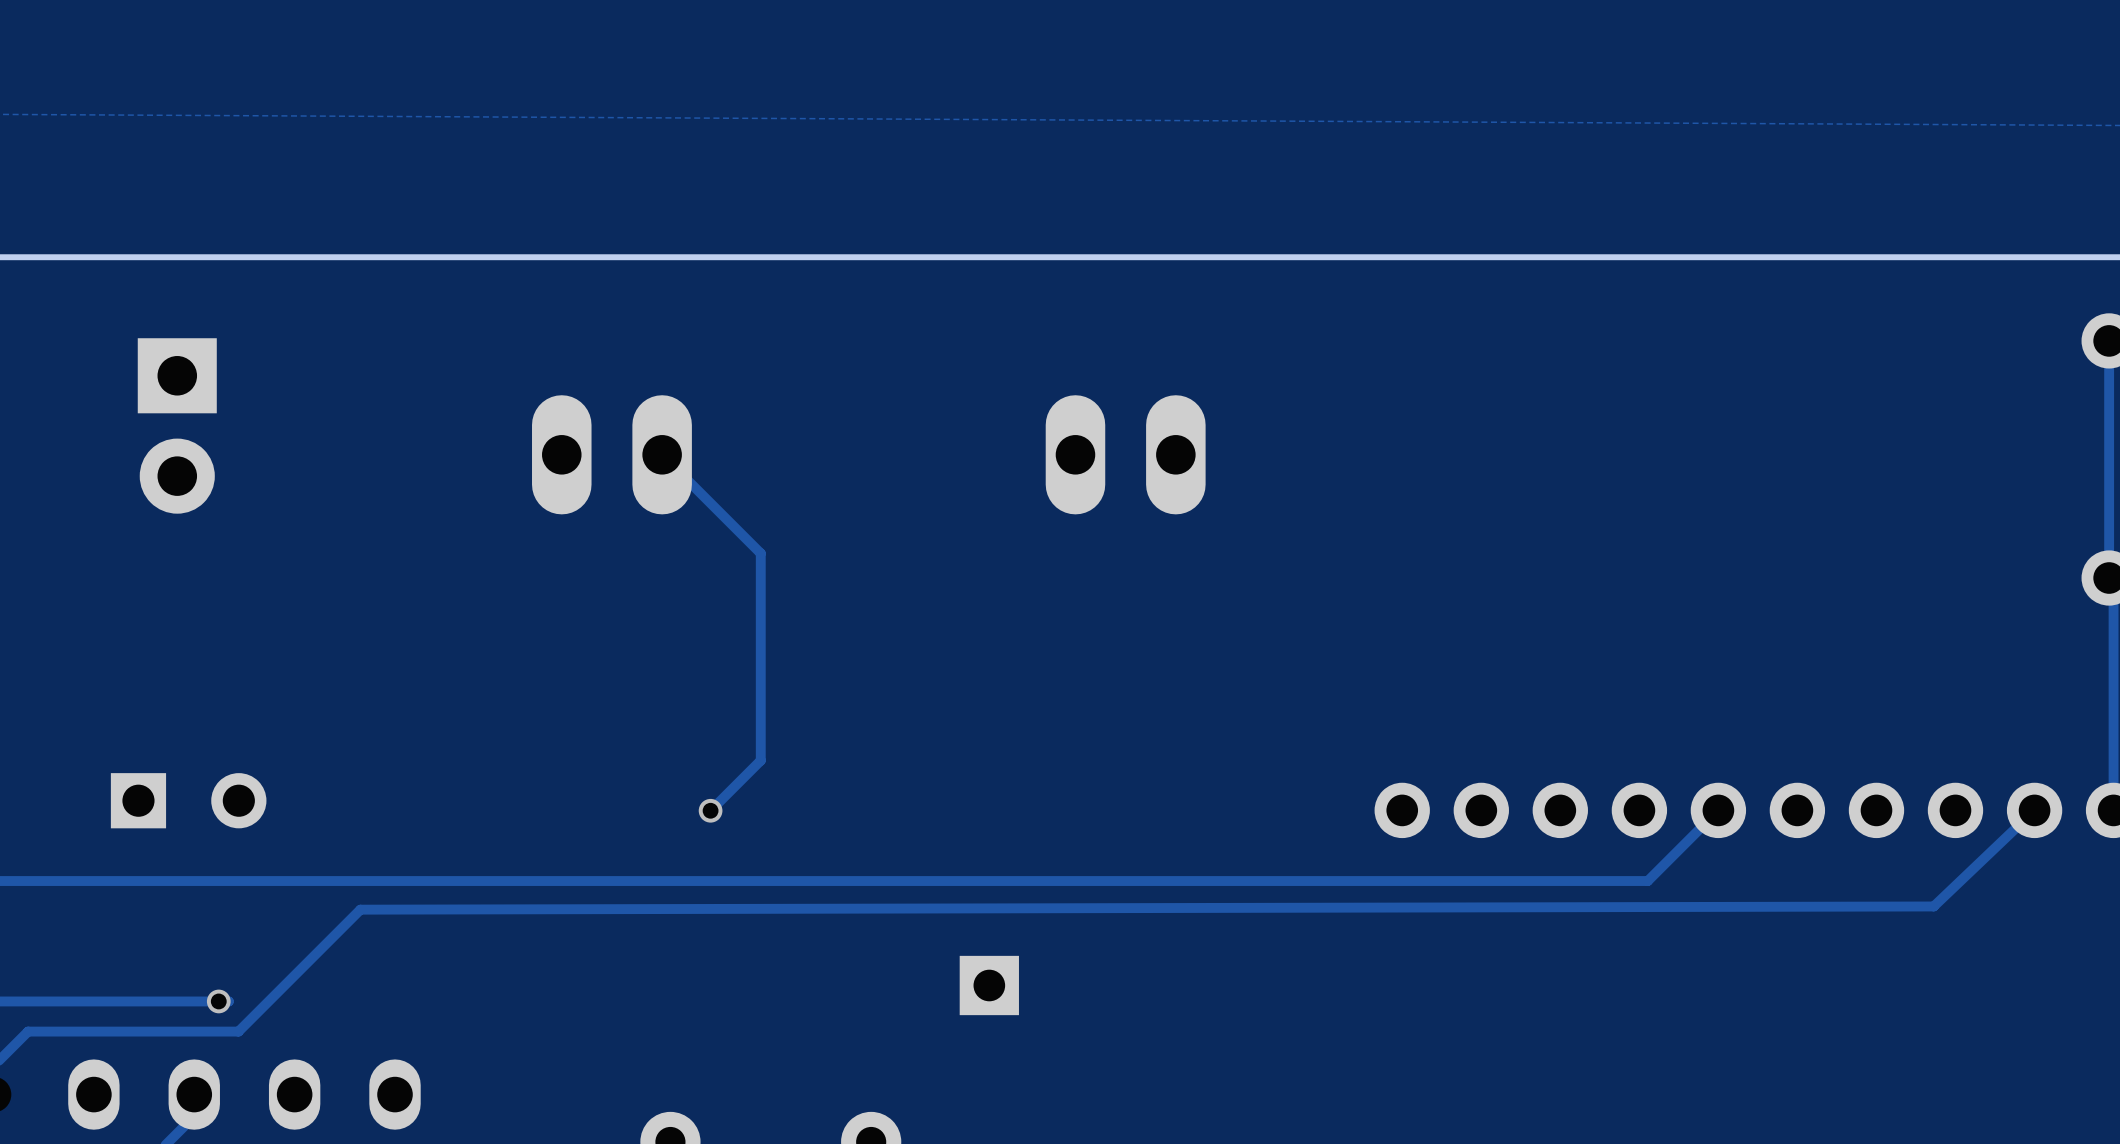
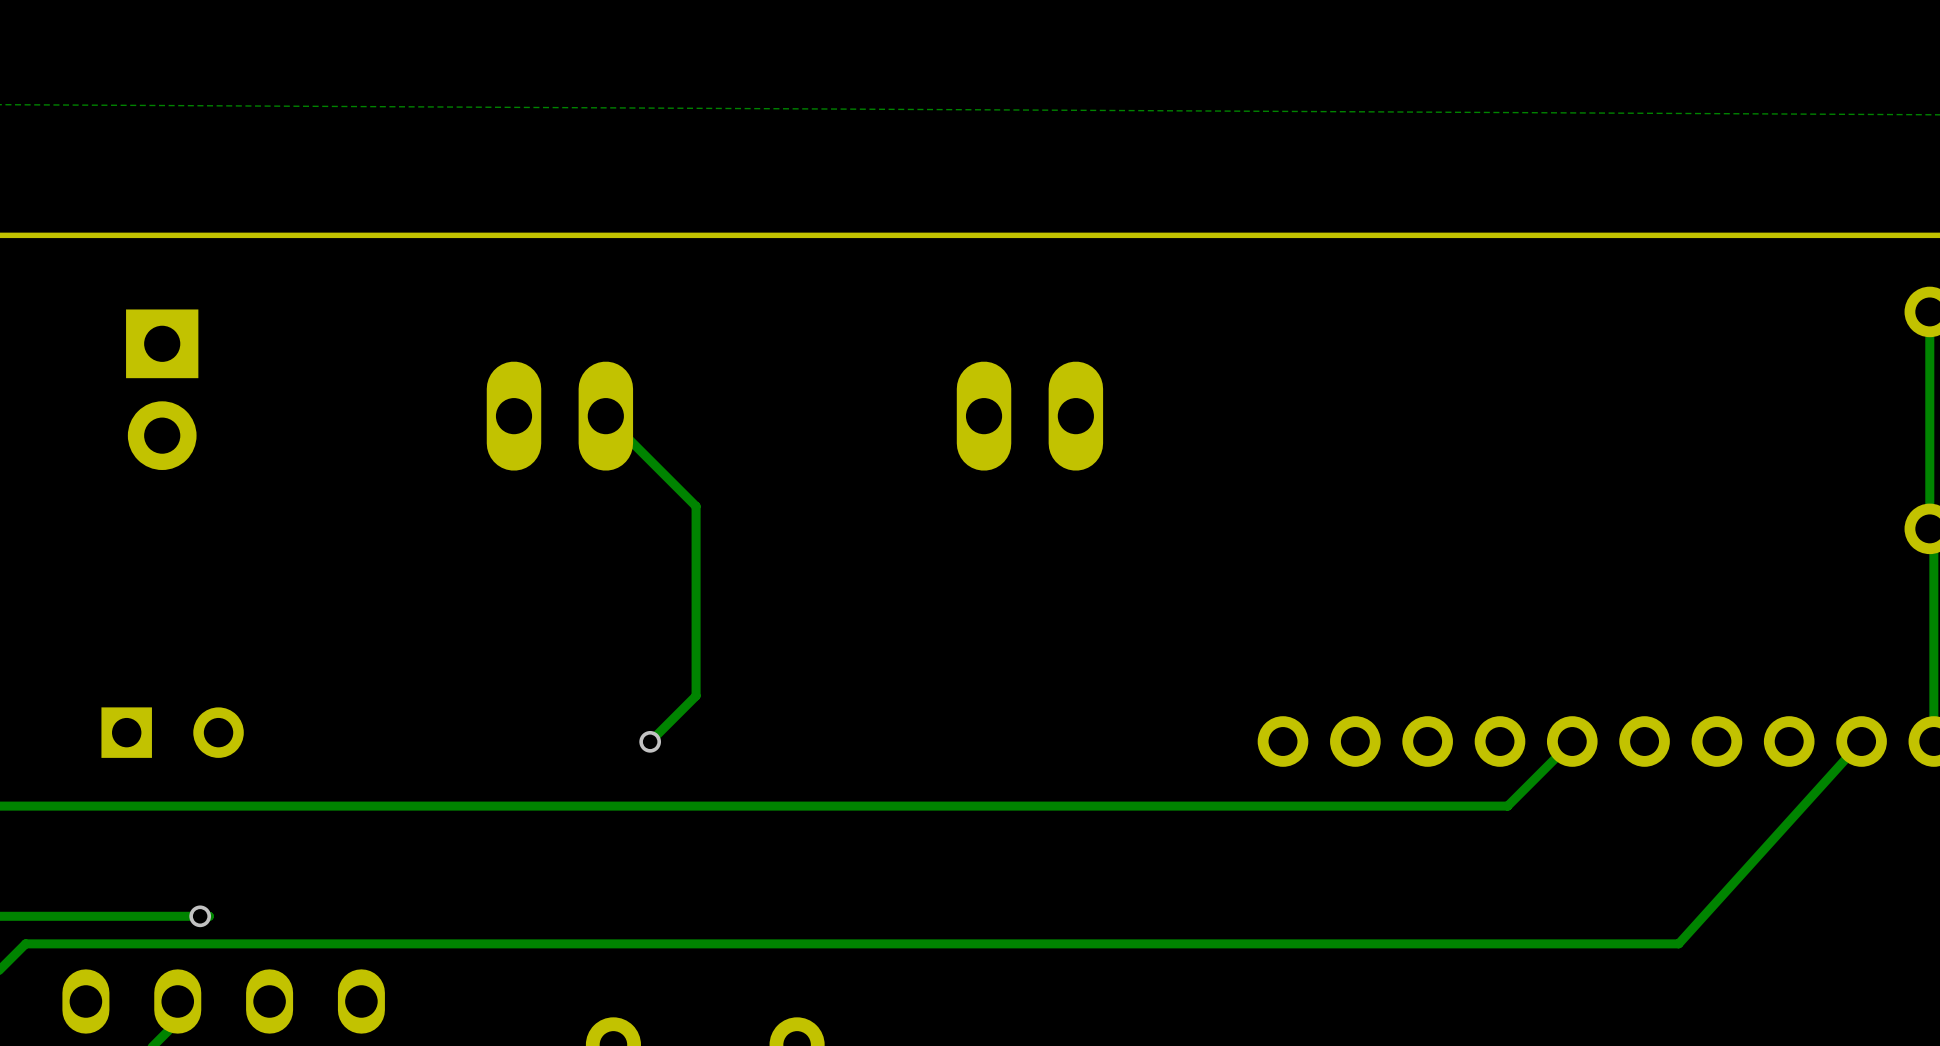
track: (2034, 810) (1933, 906) (360, 909) (238, 1031) -> (1861, 741) (1678, 943) (218, 943)
part: (989, 985) -> none

